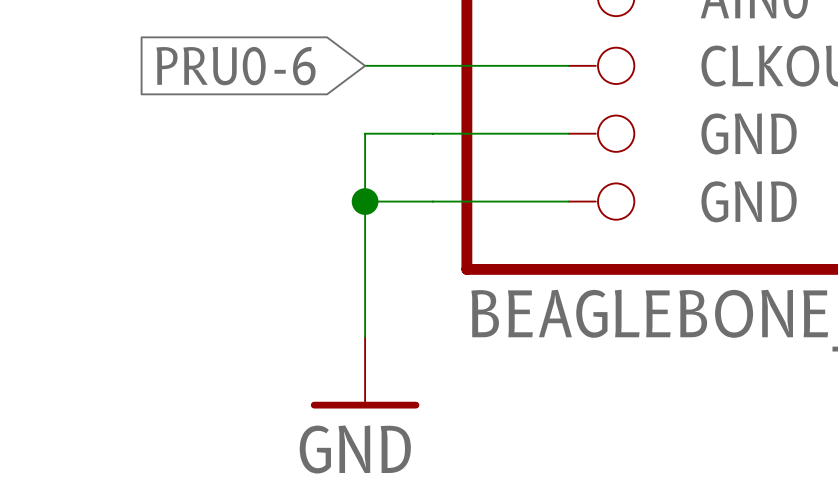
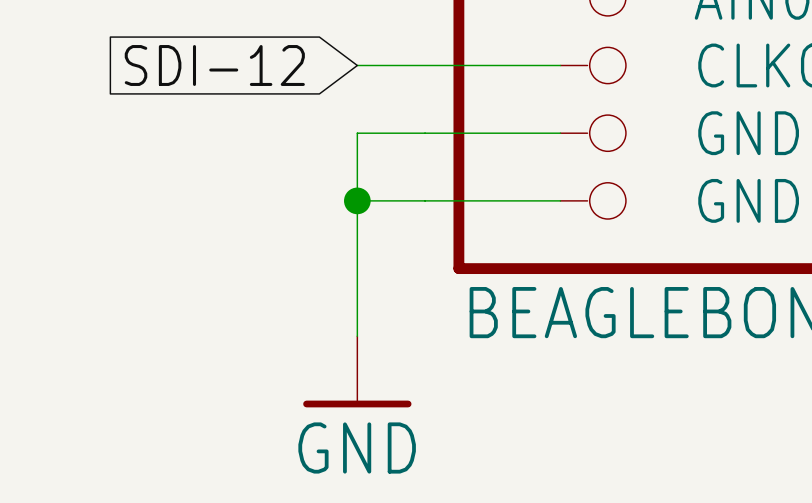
global label: PRU0-6 (236, 66) -> SDI-12 (214, 65)

